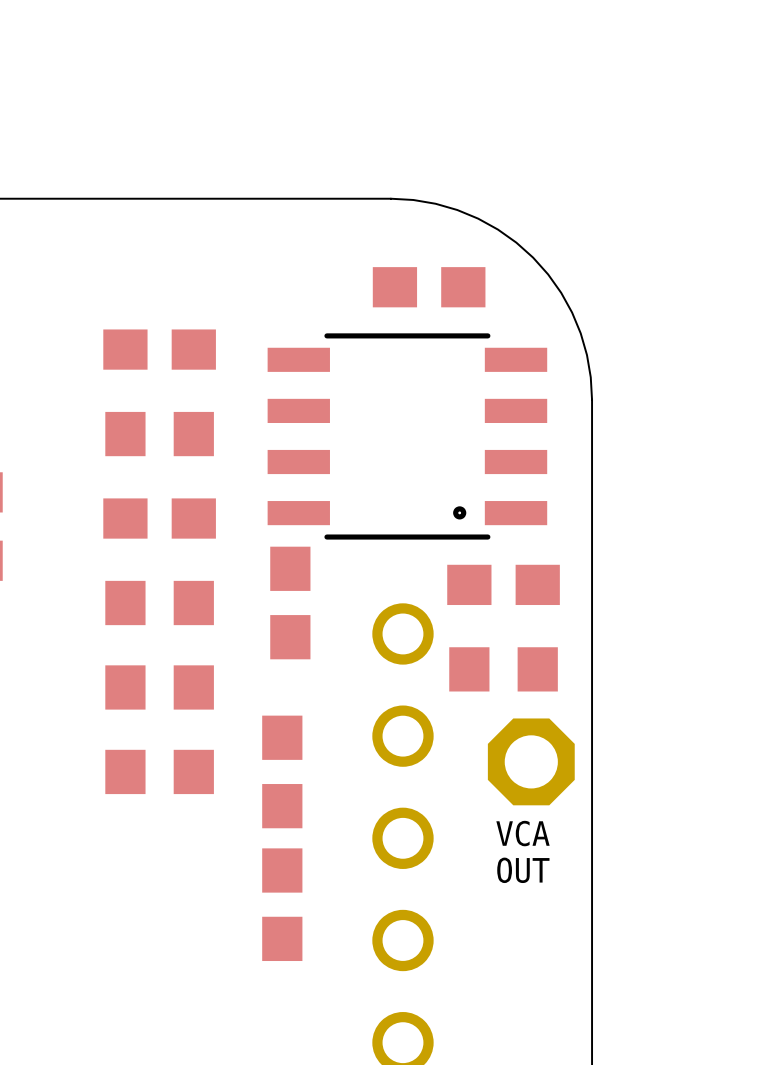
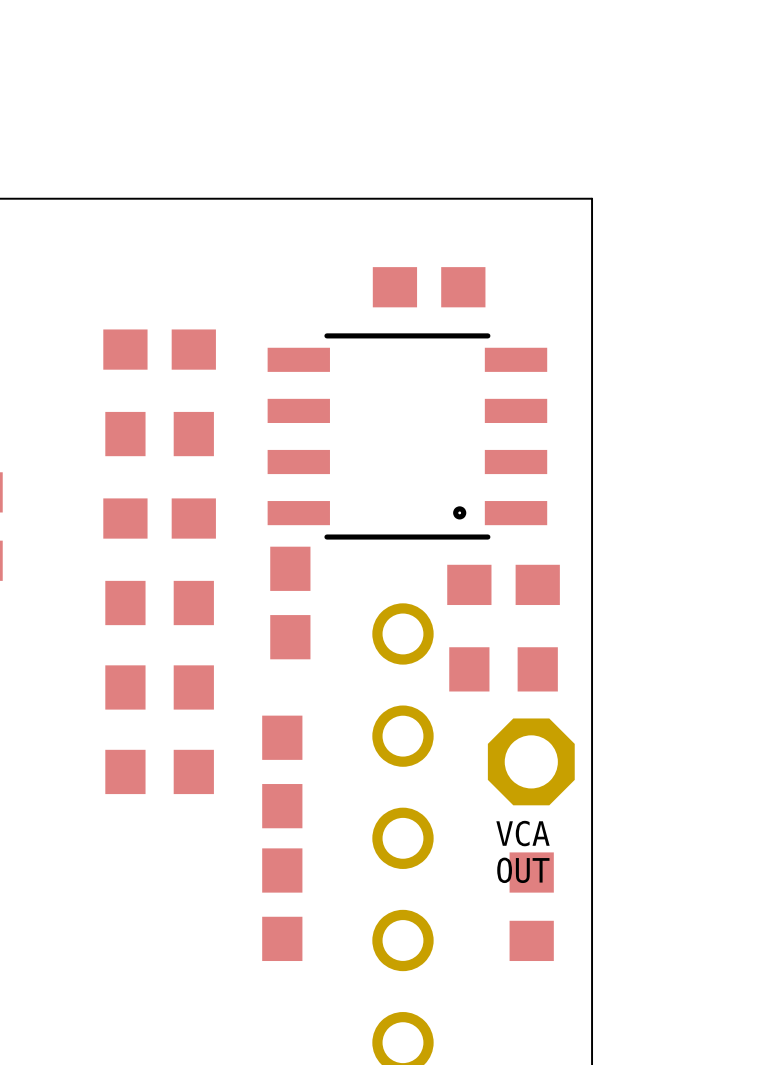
board edge: (390, 198) (413, 199) (457, 210) (497, 229) (533, 257) (561, 292) (580, 333) (590, 377) (592, 399) -> (390, 198) (592, 198) (592, 399)
part: none -> (531, 906)

